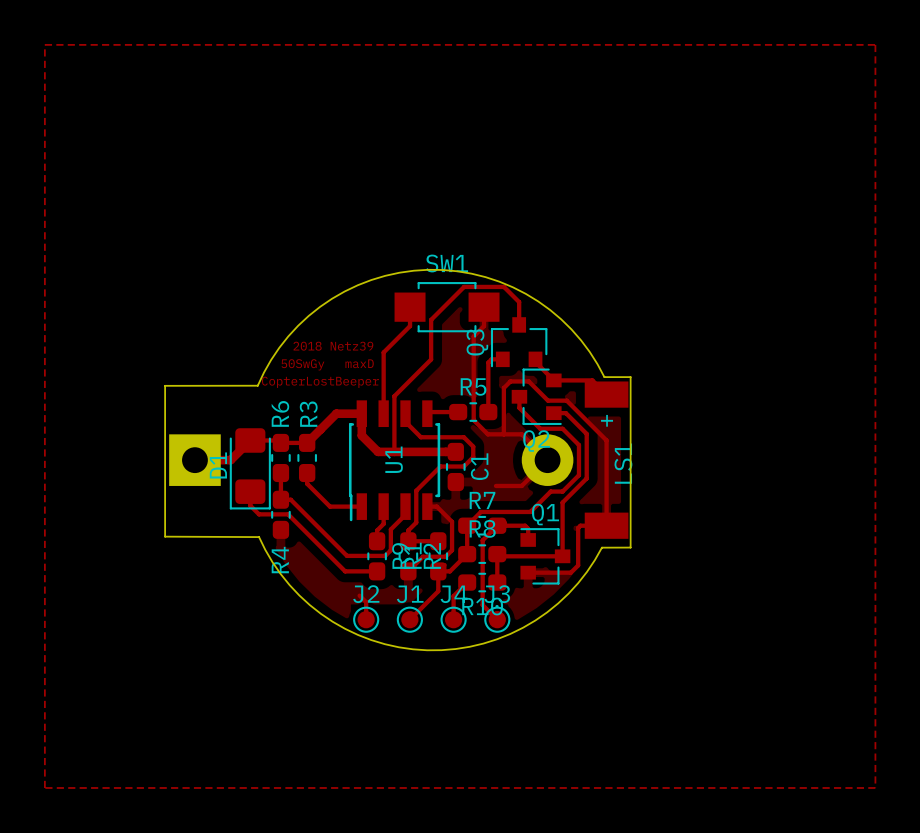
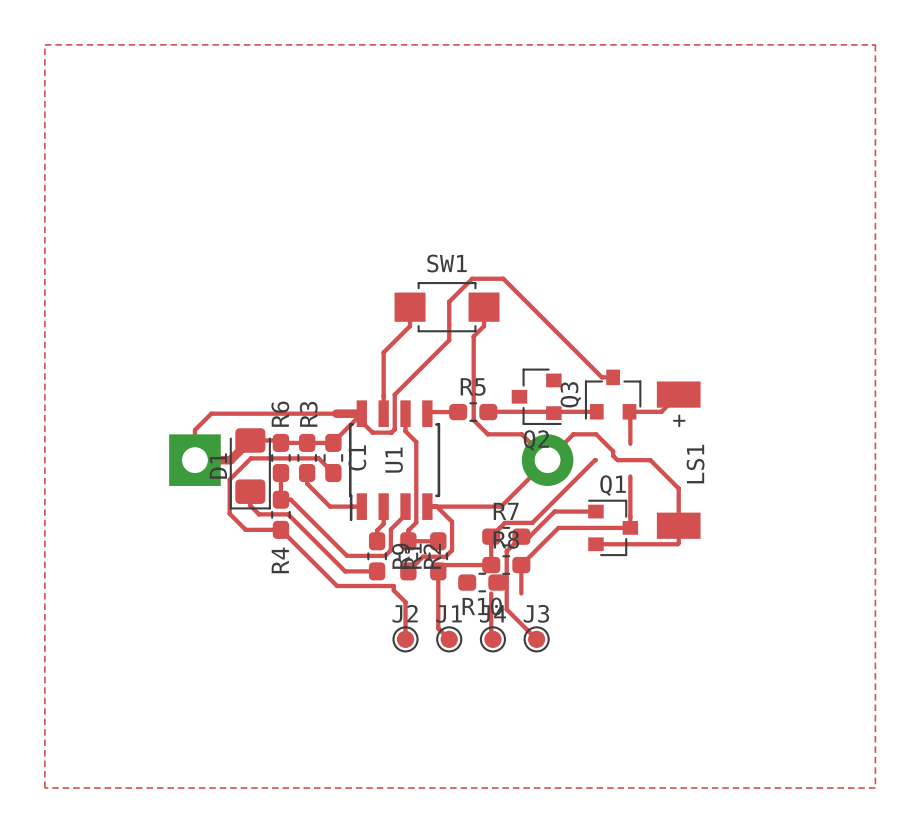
track: (464, 286) (504, 286) (519, 302) (519, 324) -> (464, 286) (472, 278) (503, 278) (601, 377) (613, 377)
track: (449, 301) (431, 319) (431, 359) (394, 396) (394, 451) -> (449, 301) (449, 340) (394, 394) (394, 429) (391, 432) (372, 432) (361, 421)
Q3 position: (519, 342) -> (613, 394)
text: 2018 Netz39 (333, 346) -> none
track: (502, 359) (491, 359) (488, 362) (488, 412) -> (596, 411) (488, 411)
track: (535, 359) (535, 362) (553, 380) (592, 380) (606, 394) -> none
text: maxD (359, 363) -> none
text: 50SwGy (302, 364) -> none
board edge: (604, 377) (630, 377) (630, 547) (601, 547) (578, 583) (558, 603) (535, 620) (497, 639) (469, 646) (441, 650) (398, 647) (371, 640) (345, 628) (309, 605) (280, 573) (259, 537) (165, 536) (165, 385) (257, 385) (271, 359) (298, 325) (332, 298) (371, 280) (399, 272) (442, 269) (471, 273) (499, 281) (525, 293) (561, 319) (589, 352) (604, 377) -> none
text: CopterLostBeeper (320, 382) -> none
track: none -> (678, 394) (661, 411) (629, 411) (630, 443)
track: (519, 396) (519, 407) (540, 428) (562, 428) (578, 445) (578, 475) (562, 491) (550, 491) (530, 511) (480, 511) (467, 525) (467, 554) (449, 571) (438, 571) -> none
track: (336, 413) (307, 442) -> (361, 413) (333, 442) (307, 442)
track: none -> (336, 413) (211, 413) (194, 430) (194, 460)
track: (360, 413) (361, 435) (378, 451) (455, 451) (414, 451) -> none
track: (553, 413) (565, 413) (586, 433) (586, 478) (562, 502) (562, 556) -> none
track: (405, 421) (420, 437) (463, 437) (473, 446) (473, 457) (463, 466) (440, 466) (416, 490) -> (405, 421) (405, 431) (416, 442) (416, 490)
track: (503, 434) (503, 388) (510, 381) (528, 381) (548, 400) (566, 400) (606, 440) (606, 525) (580, 525) (578, 527) (578, 565) (570, 572) (528, 572) -> none
track: none -> (547, 460) (573, 434) (596, 434) (613, 451) (613, 455) (617, 460) (650, 460) (678, 488) (677, 544) (595, 544)
track: none -> (595, 460) (532, 522) (505, 522)
LS1 position: (606, 460) -> (678, 460)
C1 position: (455, 466) -> (333, 457)
track: none -> (333, 473) (318, 458) (250, 458) (229, 479) (229, 513) (245, 529) (280, 529) (337, 586) (393, 586) (393, 590) (405, 602) (405, 639)
track: none -> (630, 476) (630, 527) (558, 527) (521, 565) (521, 593)
track: (495, 485) (521, 485) -> (436, 506) (501, 506) (521, 485)
track: none -> (595, 511) (554, 511) (529, 536) (521, 536) (506, 551) (506, 609) (536, 639)
R7 position: (482, 525) -> (506, 536)
track: none -> (499, 528) (491, 536) (491, 565) (444, 565)
track: (527, 539) (528, 528) (525, 525) (497, 525) (482, 540) (482, 605) (497, 619) -> none
R8 position: (482, 554) -> (506, 565)
Q1 position: (545, 556) -> (613, 527)
track: (567, 556) (499, 556) (497, 554) (497, 582) -> none
track: (467, 582) (453, 596) (453, 619) (451, 617) -> none
track: (438, 591) (409, 619) -> (438, 591) (438, 628) (449, 639)
track: none -> (491, 593) (491, 637) (492, 639)
track: (359, 595) (366, 602) (366, 619) -> none
J2 position: (366, 619) -> (405, 639)
J1 position: (409, 619) -> (449, 639)
J4 position: (453, 619) -> (492, 639)
J3 position: (497, 619) -> (536, 639)

